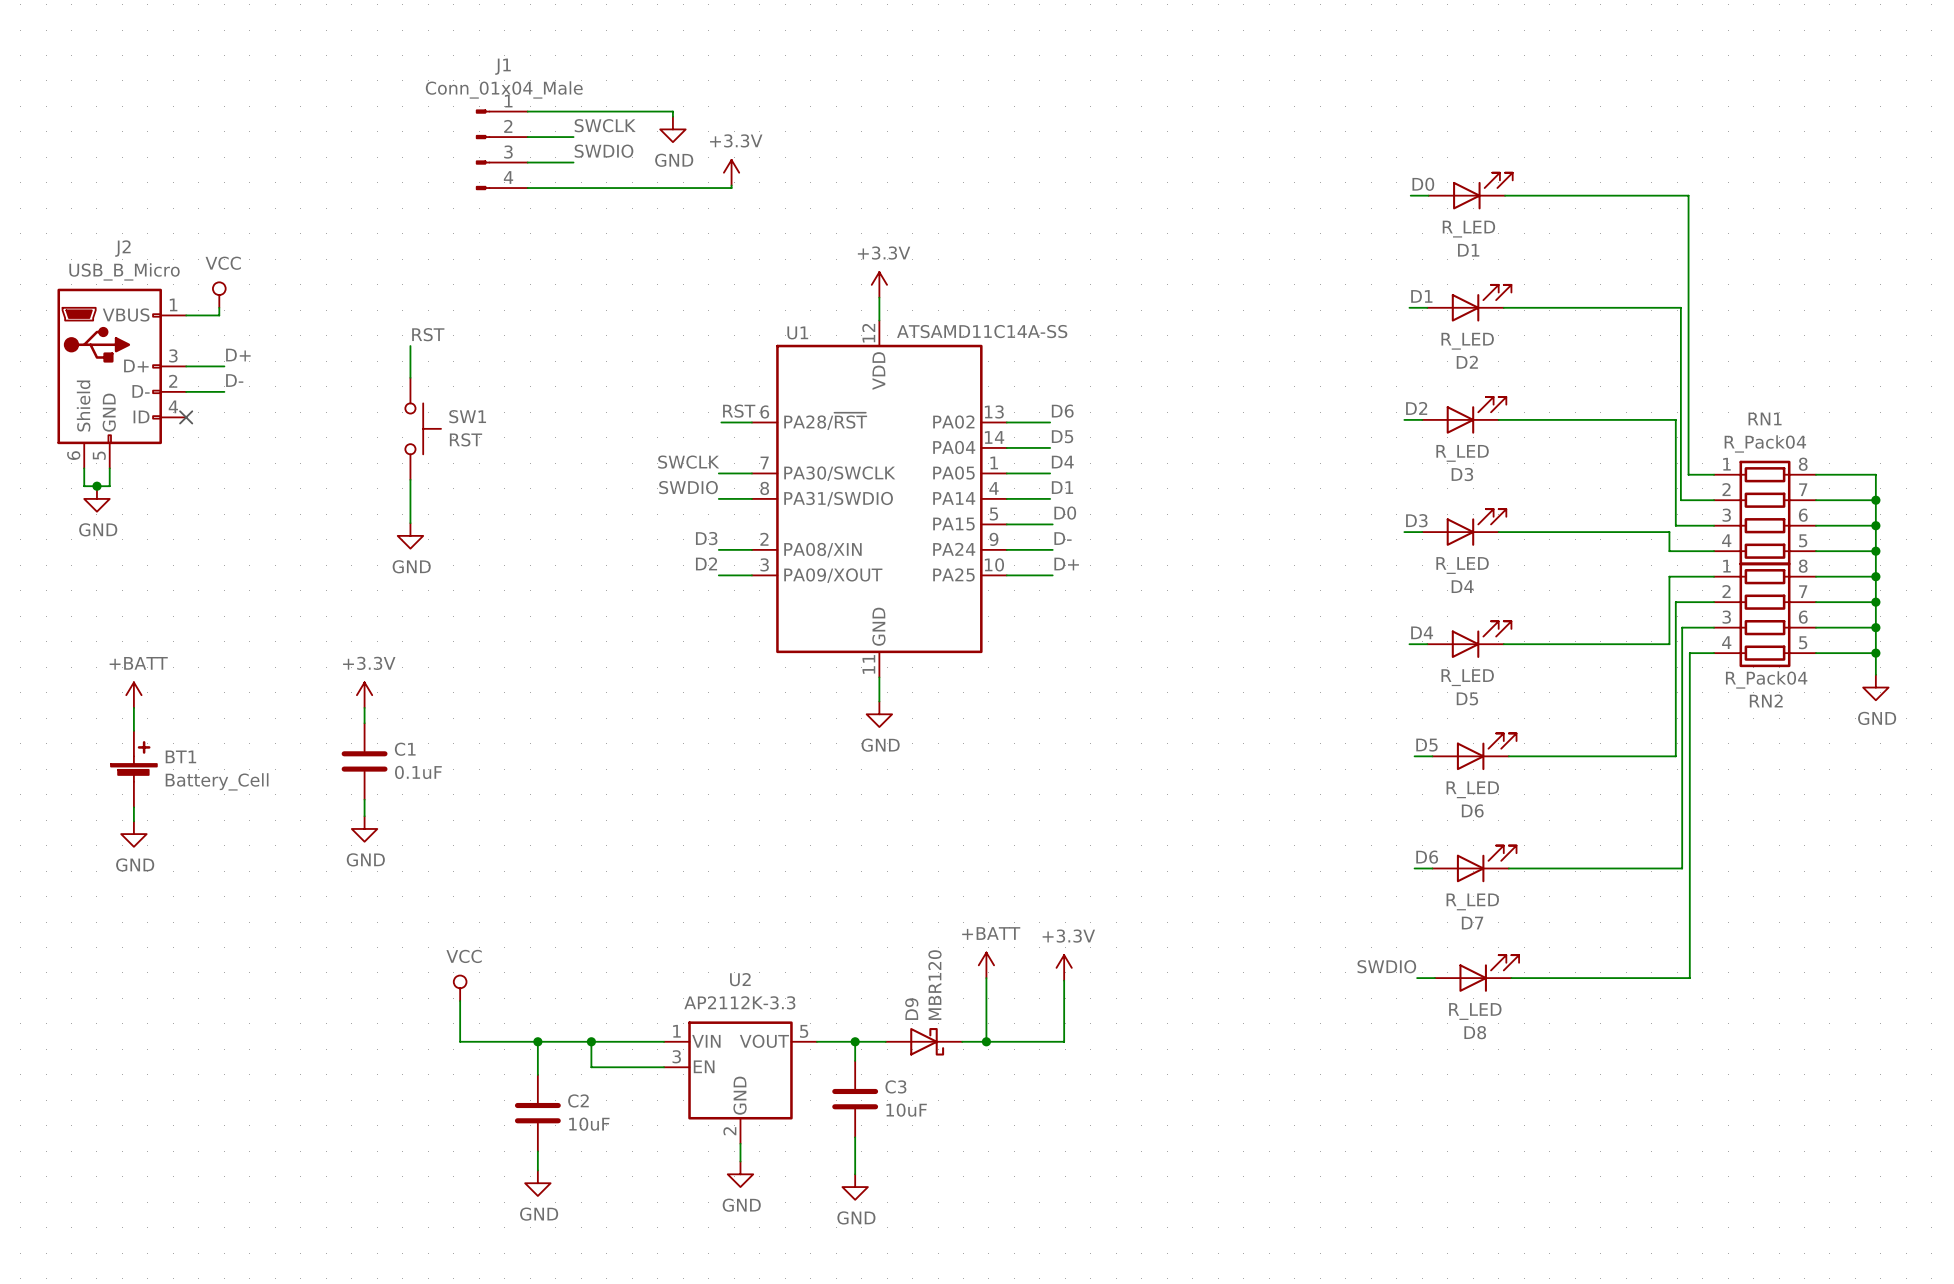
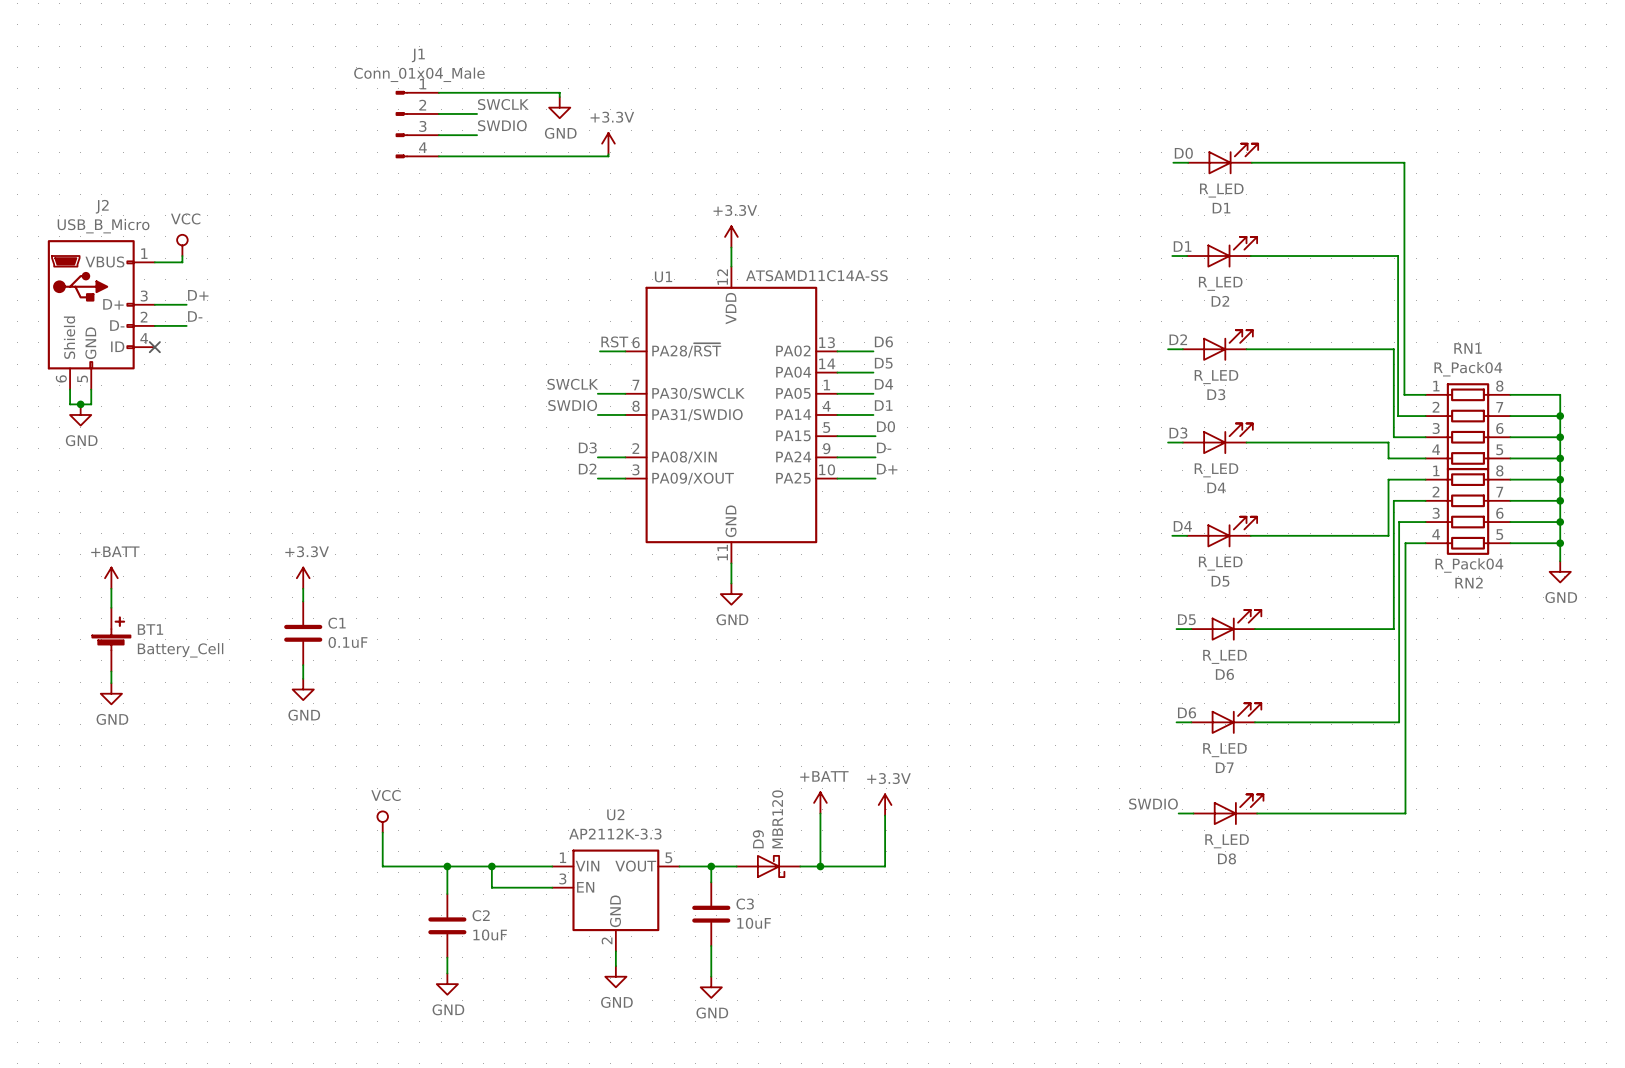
label: RST (428, 334) -> none
wire: (410, 346) (410, 377) -> none
SW1: RST (423, 428) -> none
wire: (410, 479) (410, 523) -> none
power symbol: GND (410, 535) -> none

